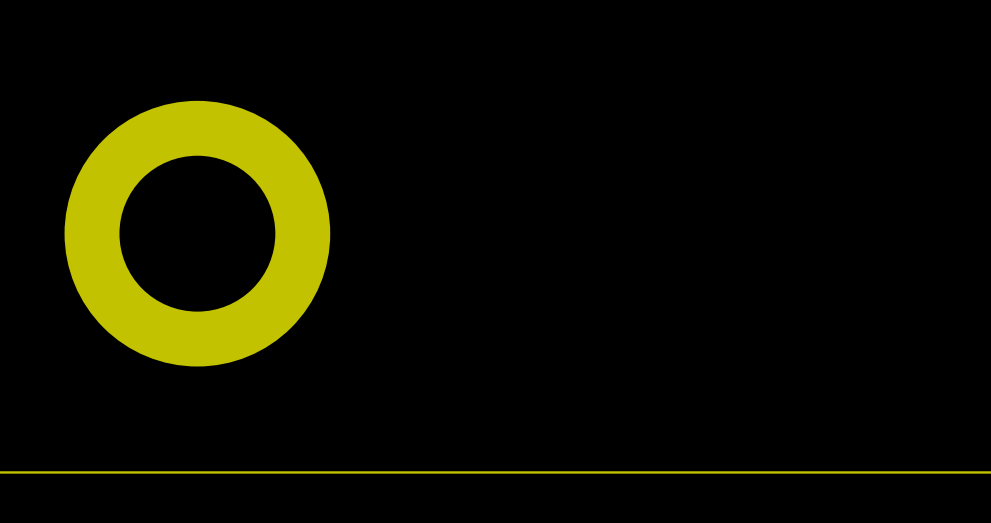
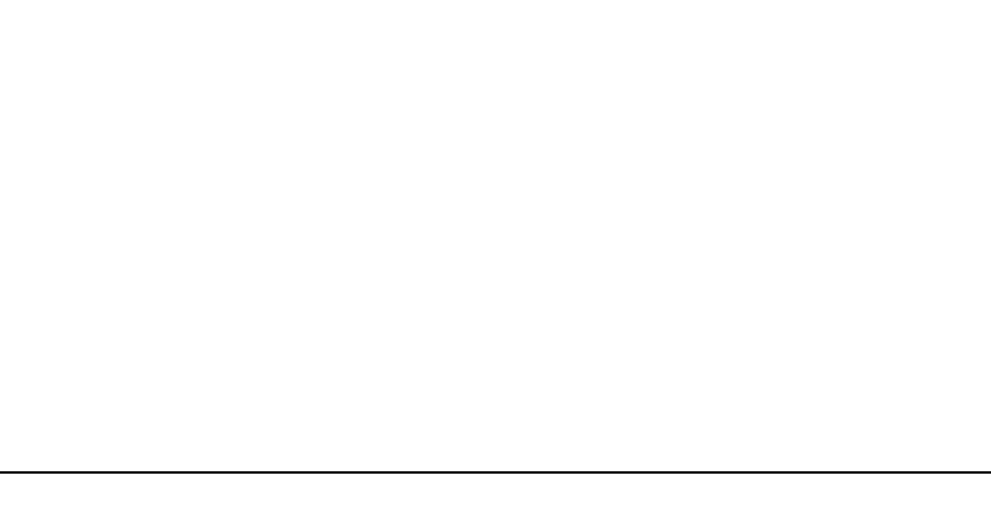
part: (197, 233) -> none

